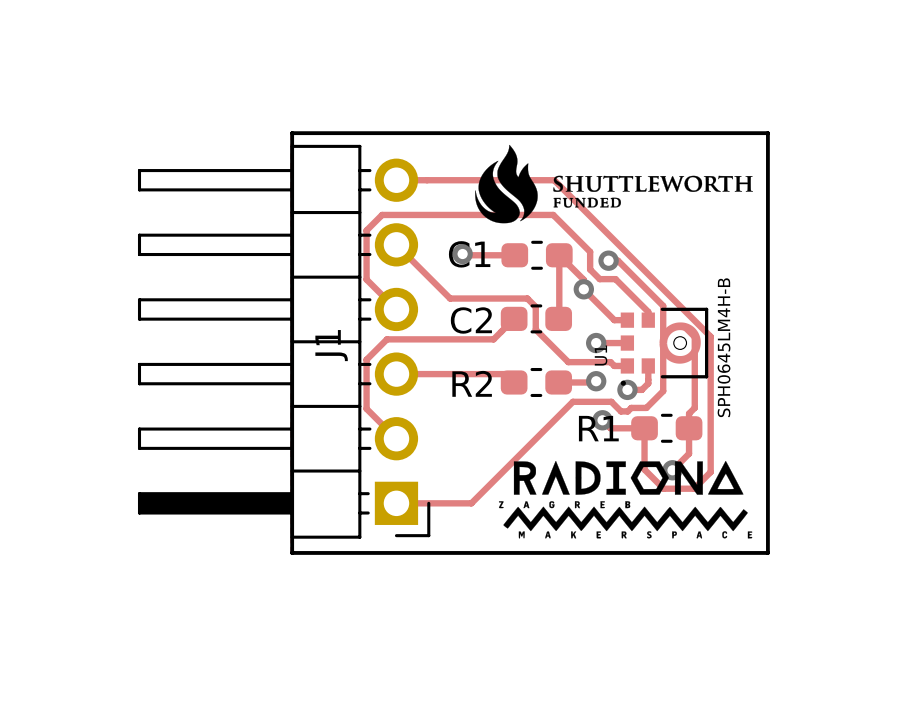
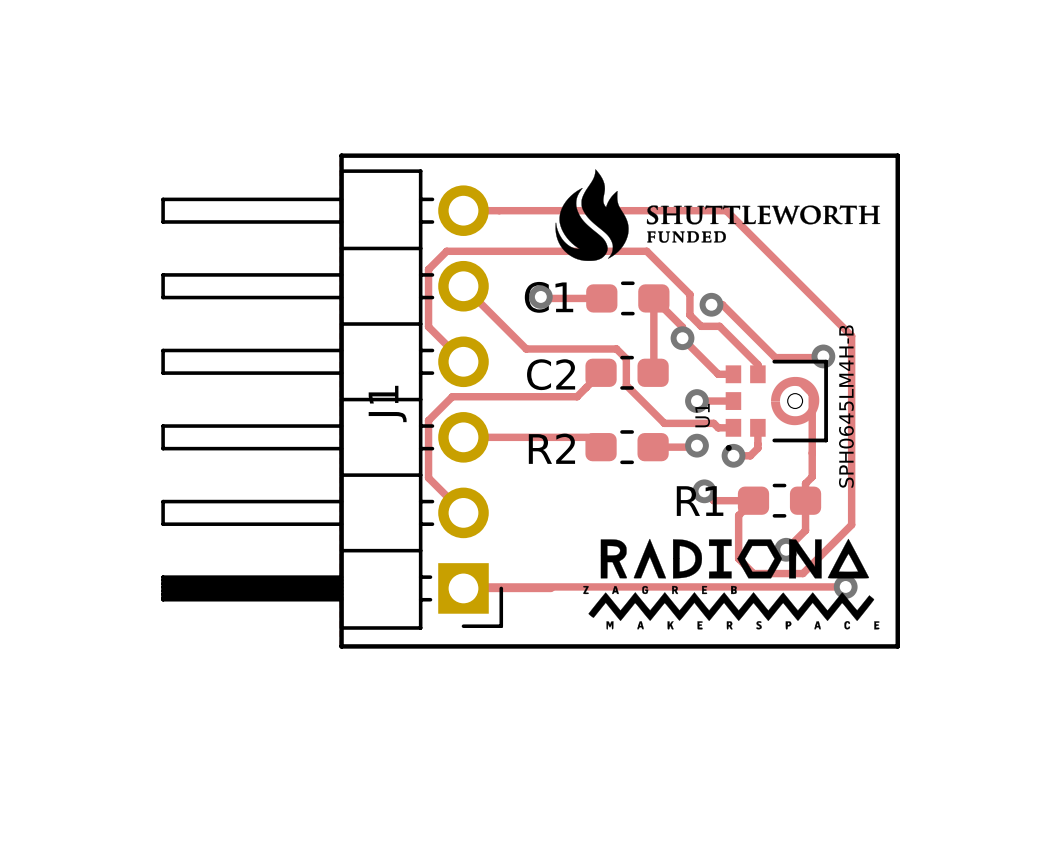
track: (554, 180) (710, 336) (710, 472) (694, 488) (663, 488) (644, 469) (644, 428) -> (647, 210) (726, 210) (851, 336) (851, 524) (802, 573) (753, 573) (738, 558) (738, 515) (753, 500)
via: none -> (823, 356)
track: (663, 305) (663, 391) (646, 407) (631, 407) (627, 411) (620, 411) (611, 401) (572, 401) (471, 503) -> (775, 357) (823, 356)
track: none -> (845, 586) (463, 588)
via: none -> (845, 586)

